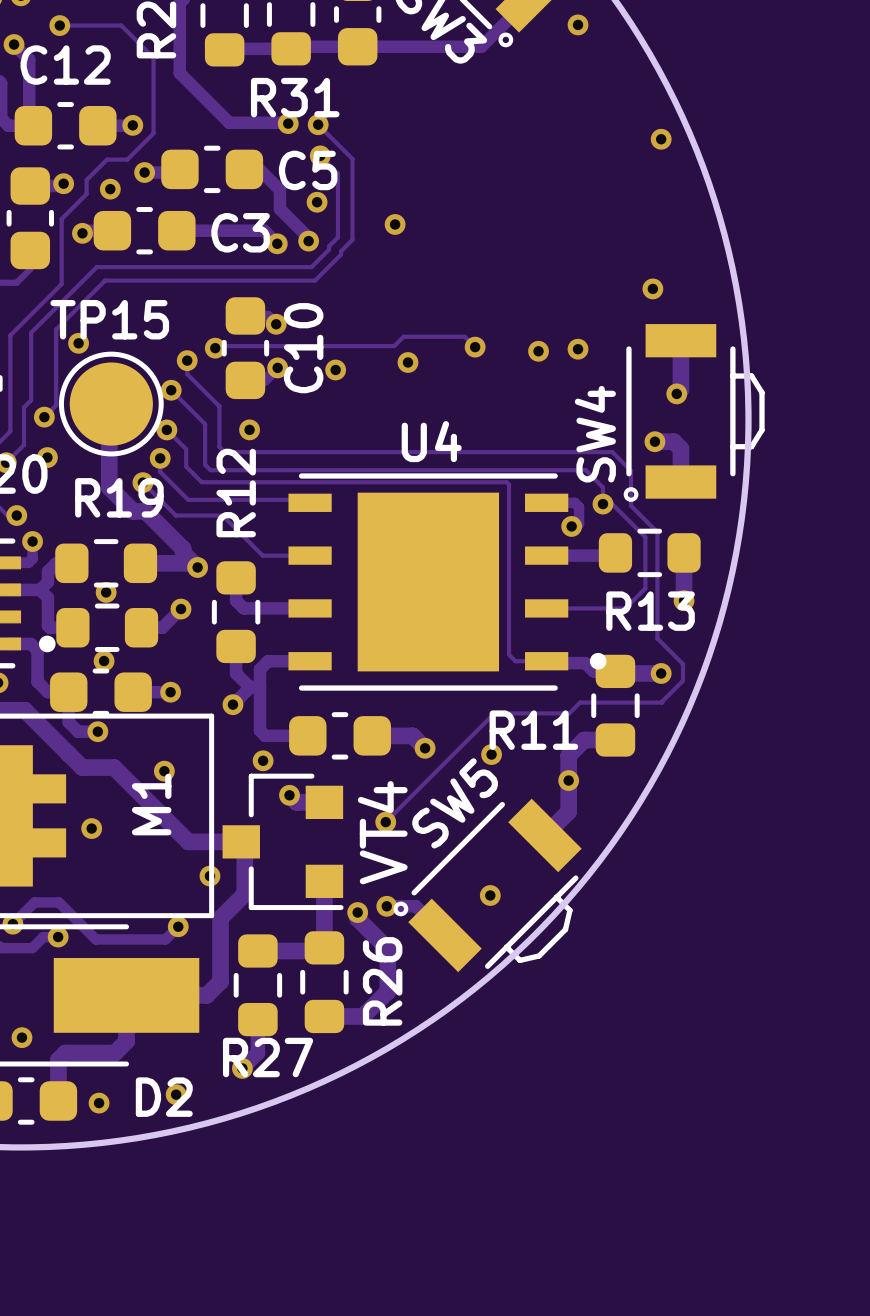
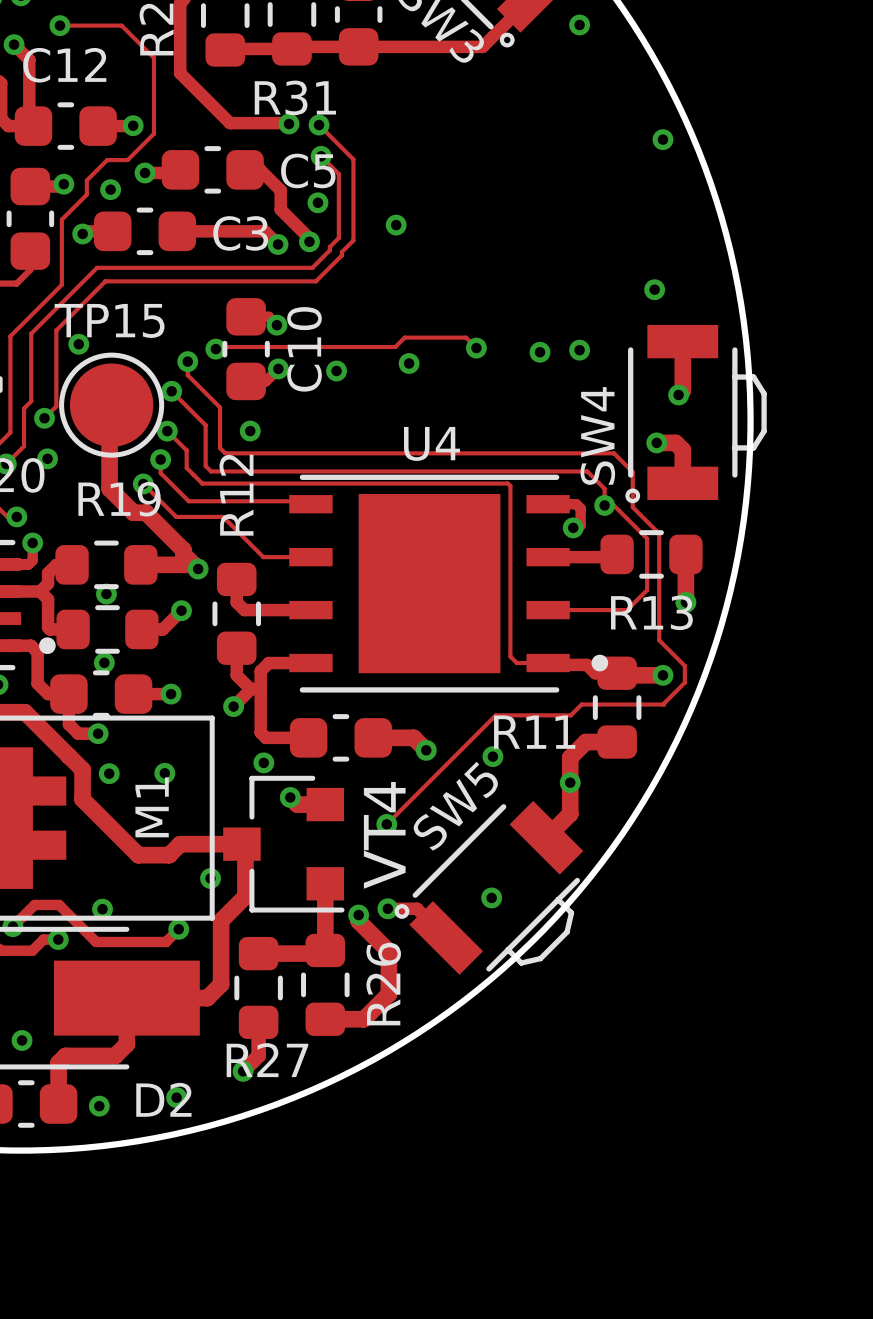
track: (82, 767) (114, 767) (188, 841) -> (82, 769) (82, 799) (138, 855) (169, 855) (180, 844) (188, 844)
via: none -> (109, 773)
via: (91, 828) -> none
via: none -> (102, 909)

